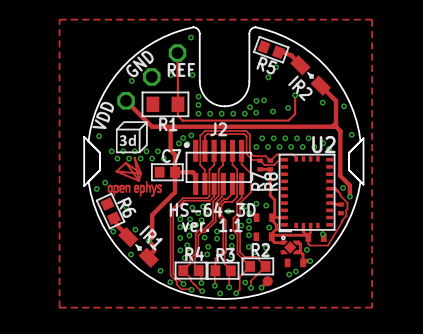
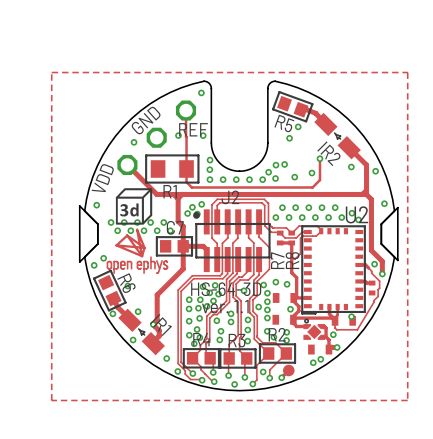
track: none -> (321, 231) (316, 236) (302, 236) (300, 238) (300, 253) (295, 259) (291, 259)

